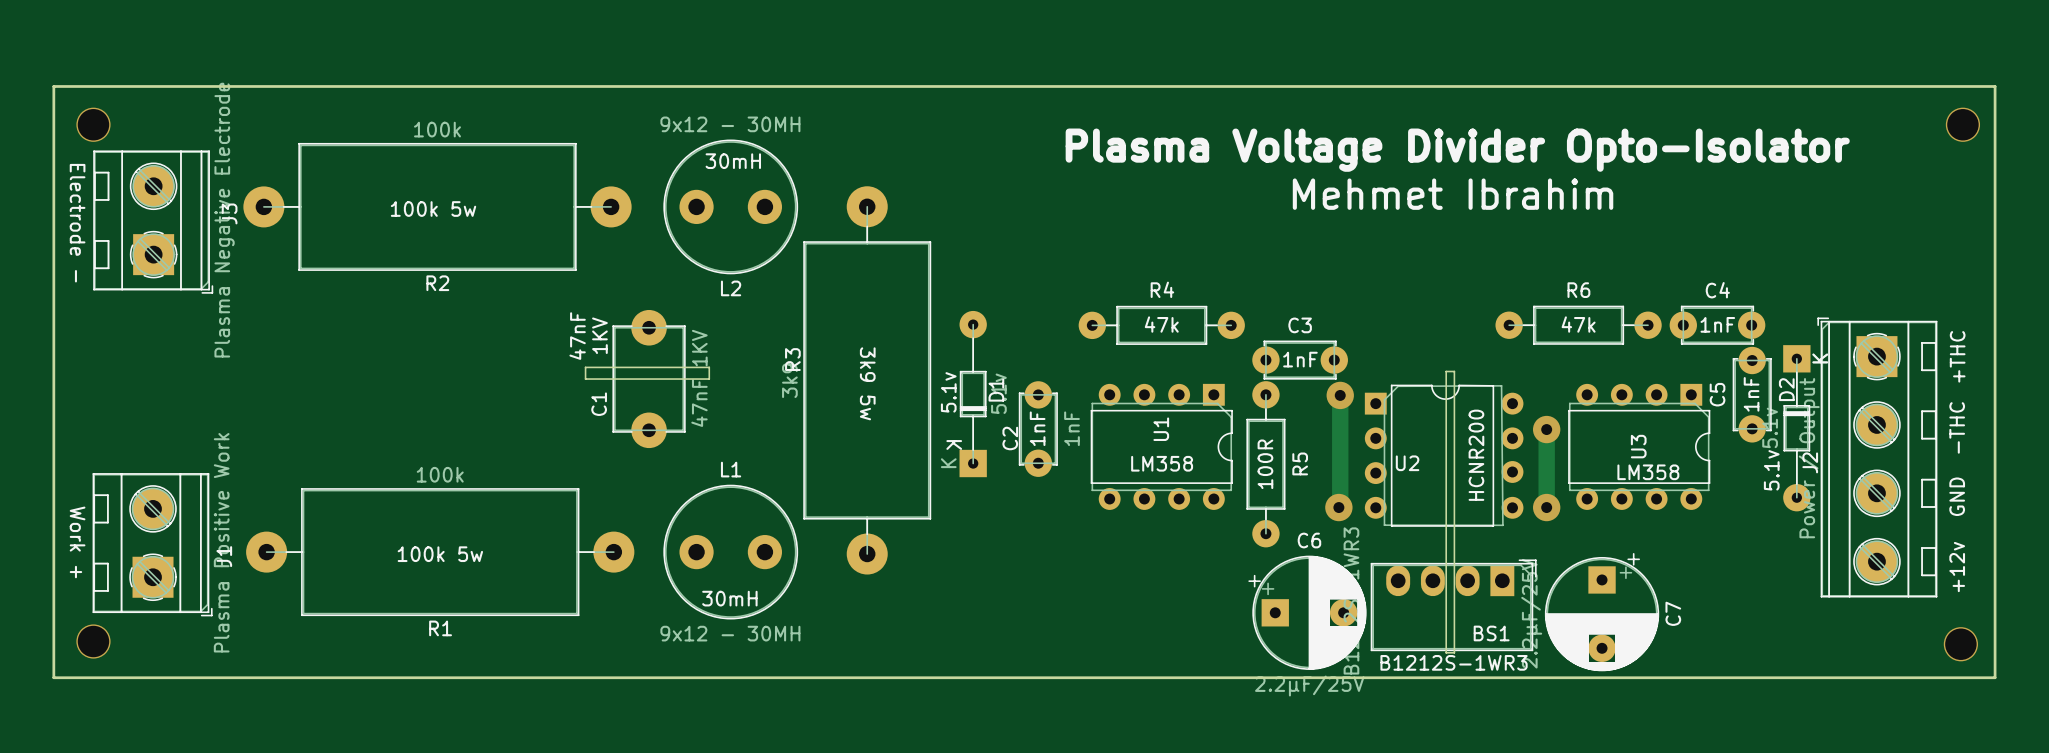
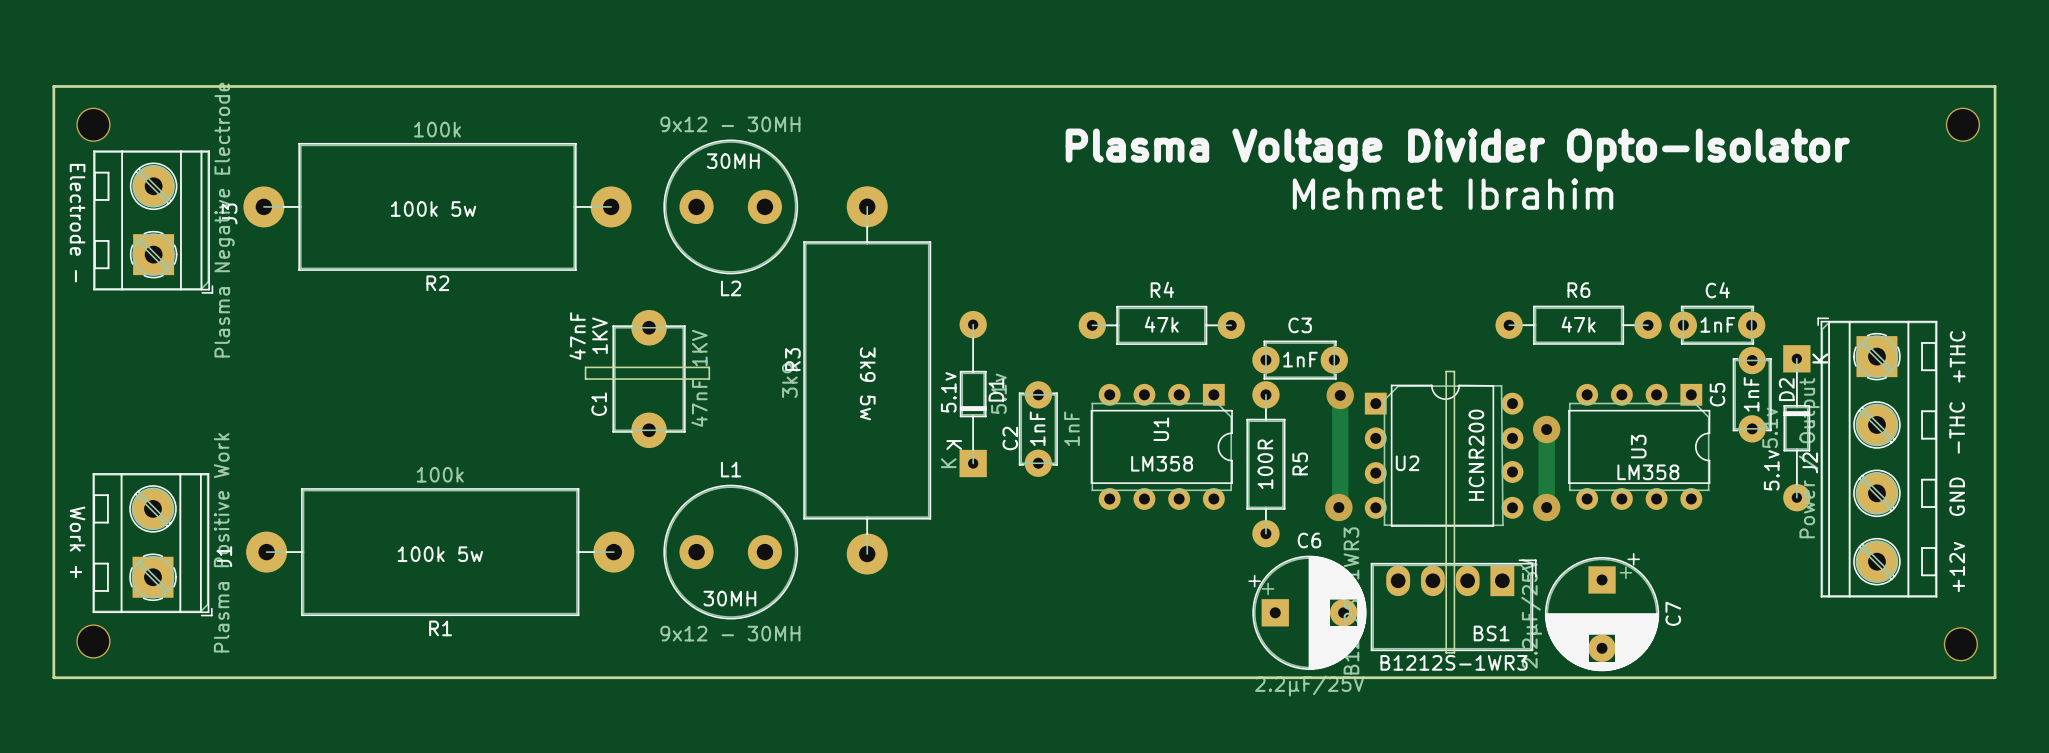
text: 30mH (733, 161) -> 30MH (733, 161)
text: 30mH (729, 598) -> 30MH (729, 598)

